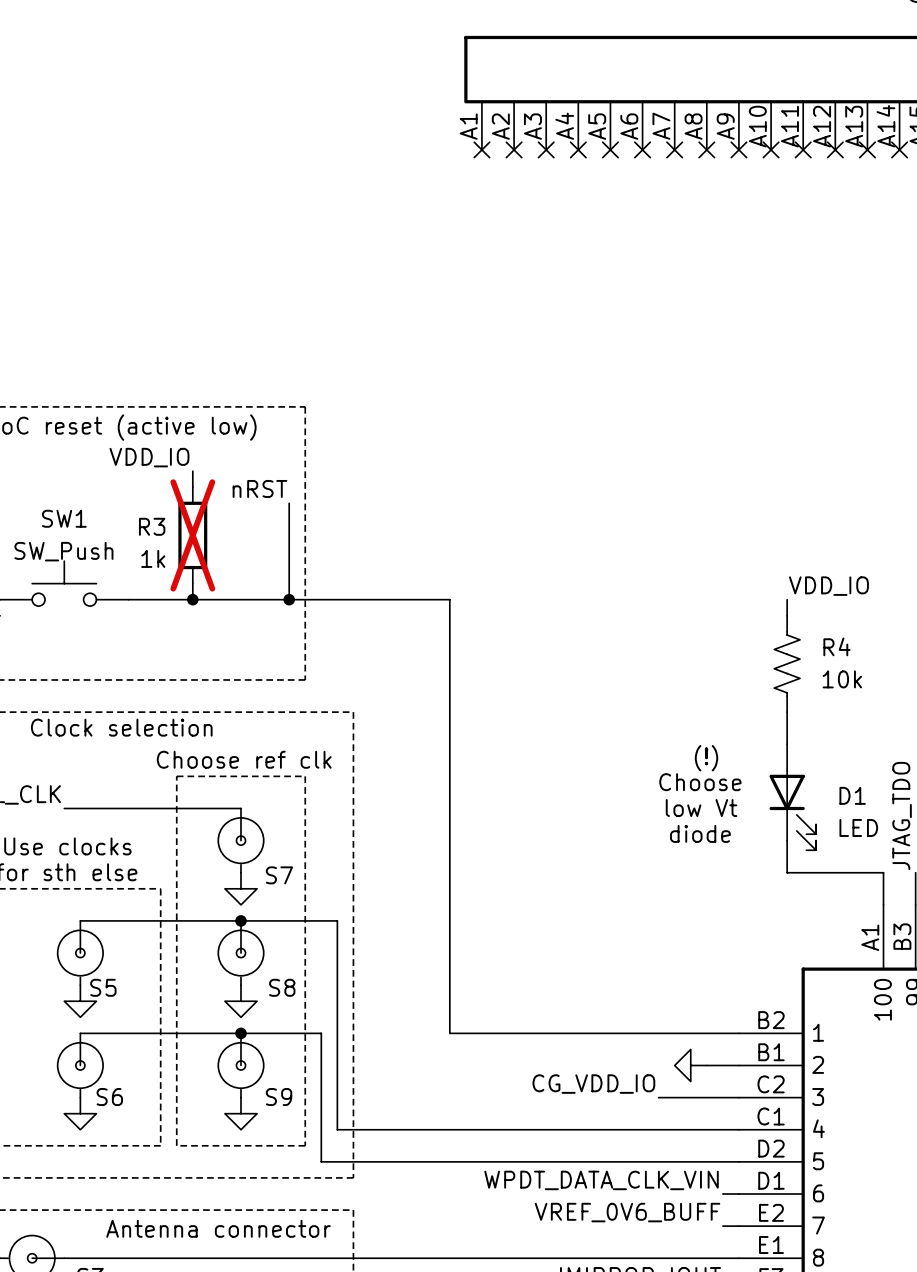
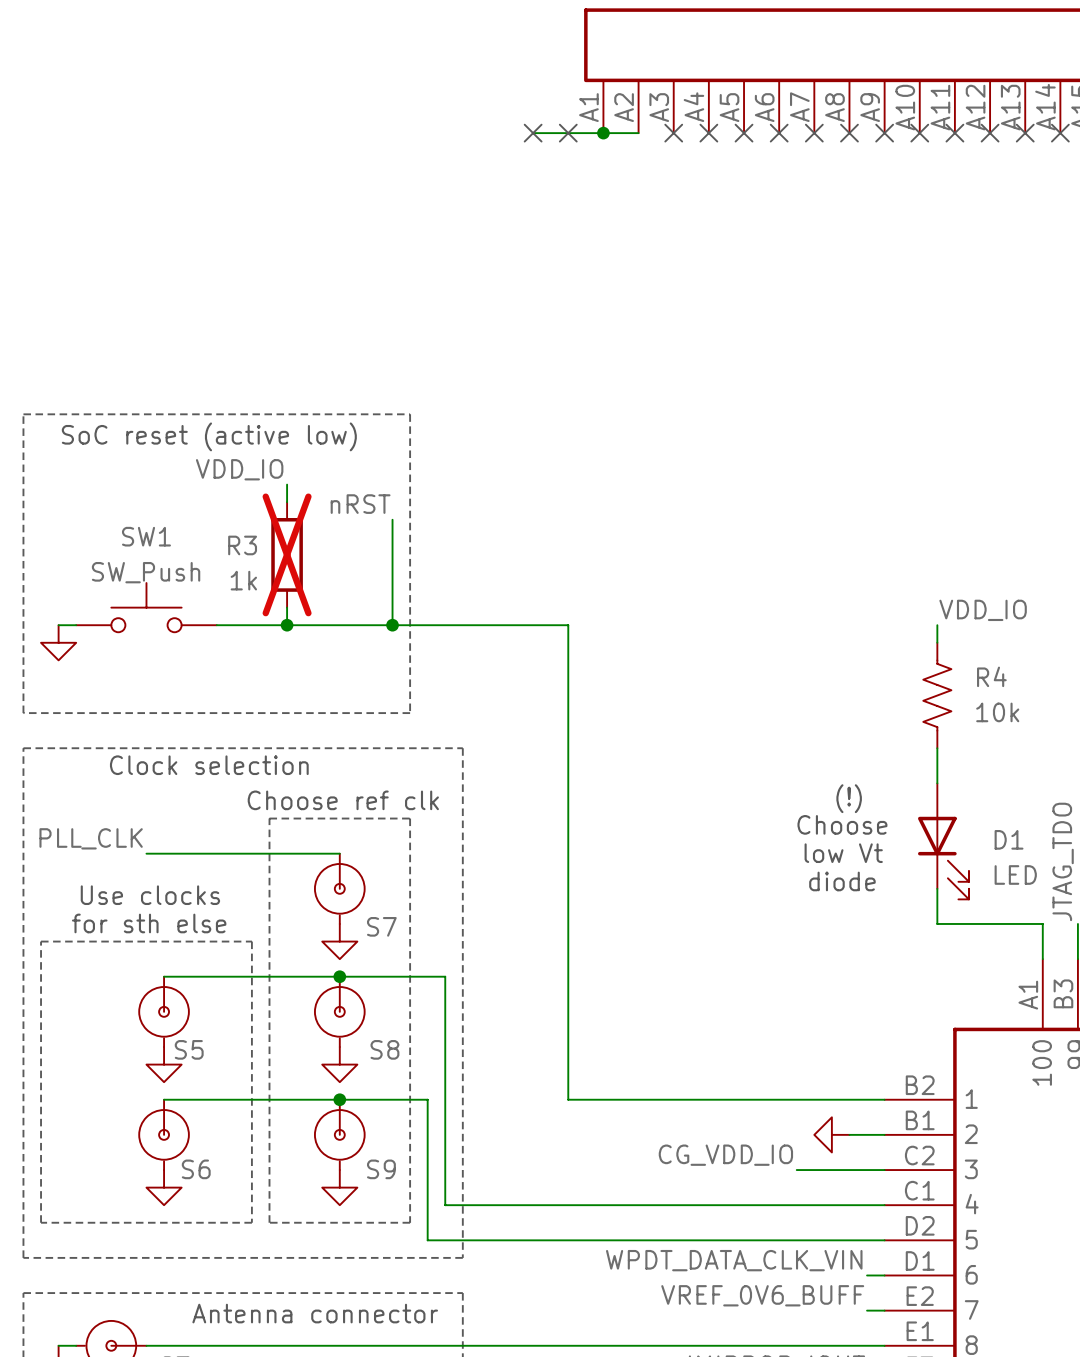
wire: none -> (533, 133) (638, 133)
no-connect mark: none -> (533, 133)
no-connect mark: none -> (568, 133)
no-connect mark: (481, 149) -> none
junction: none -> (603, 133)
no-connect mark: (514, 149) -> none

